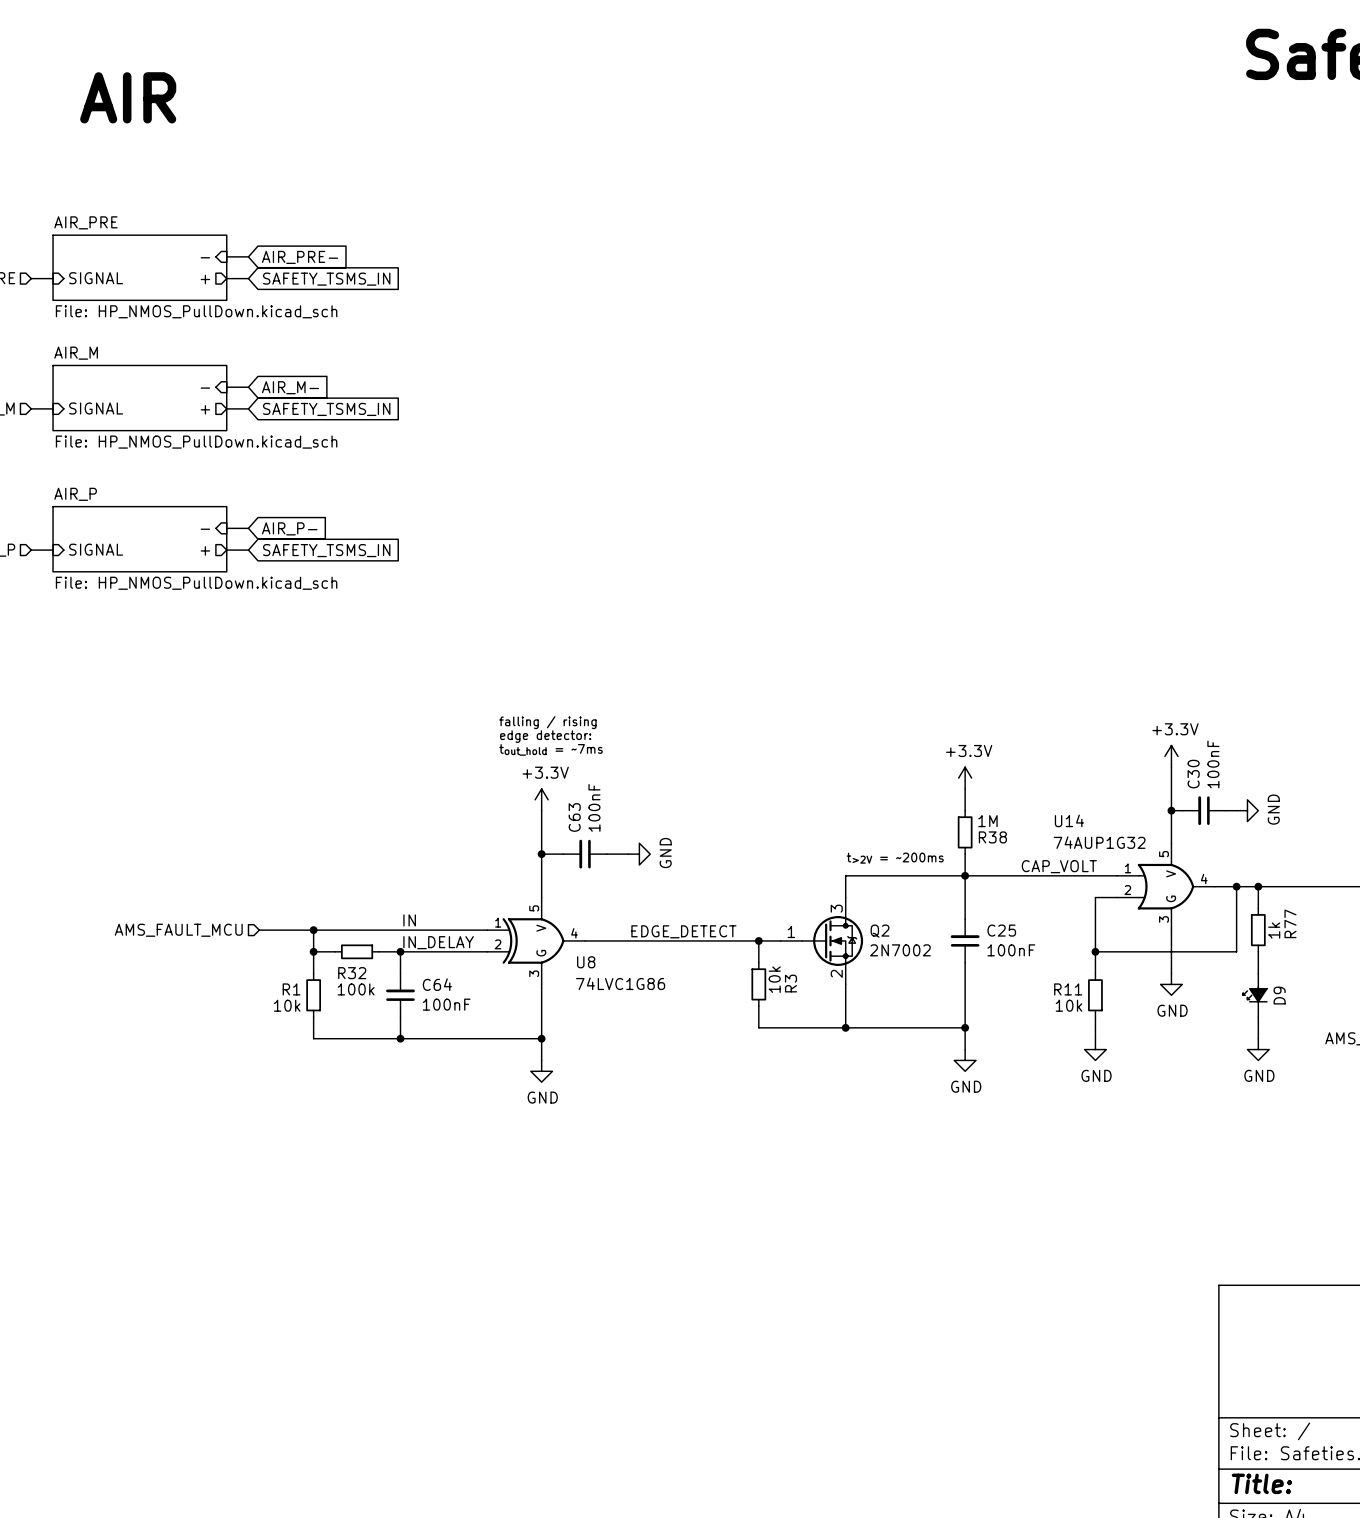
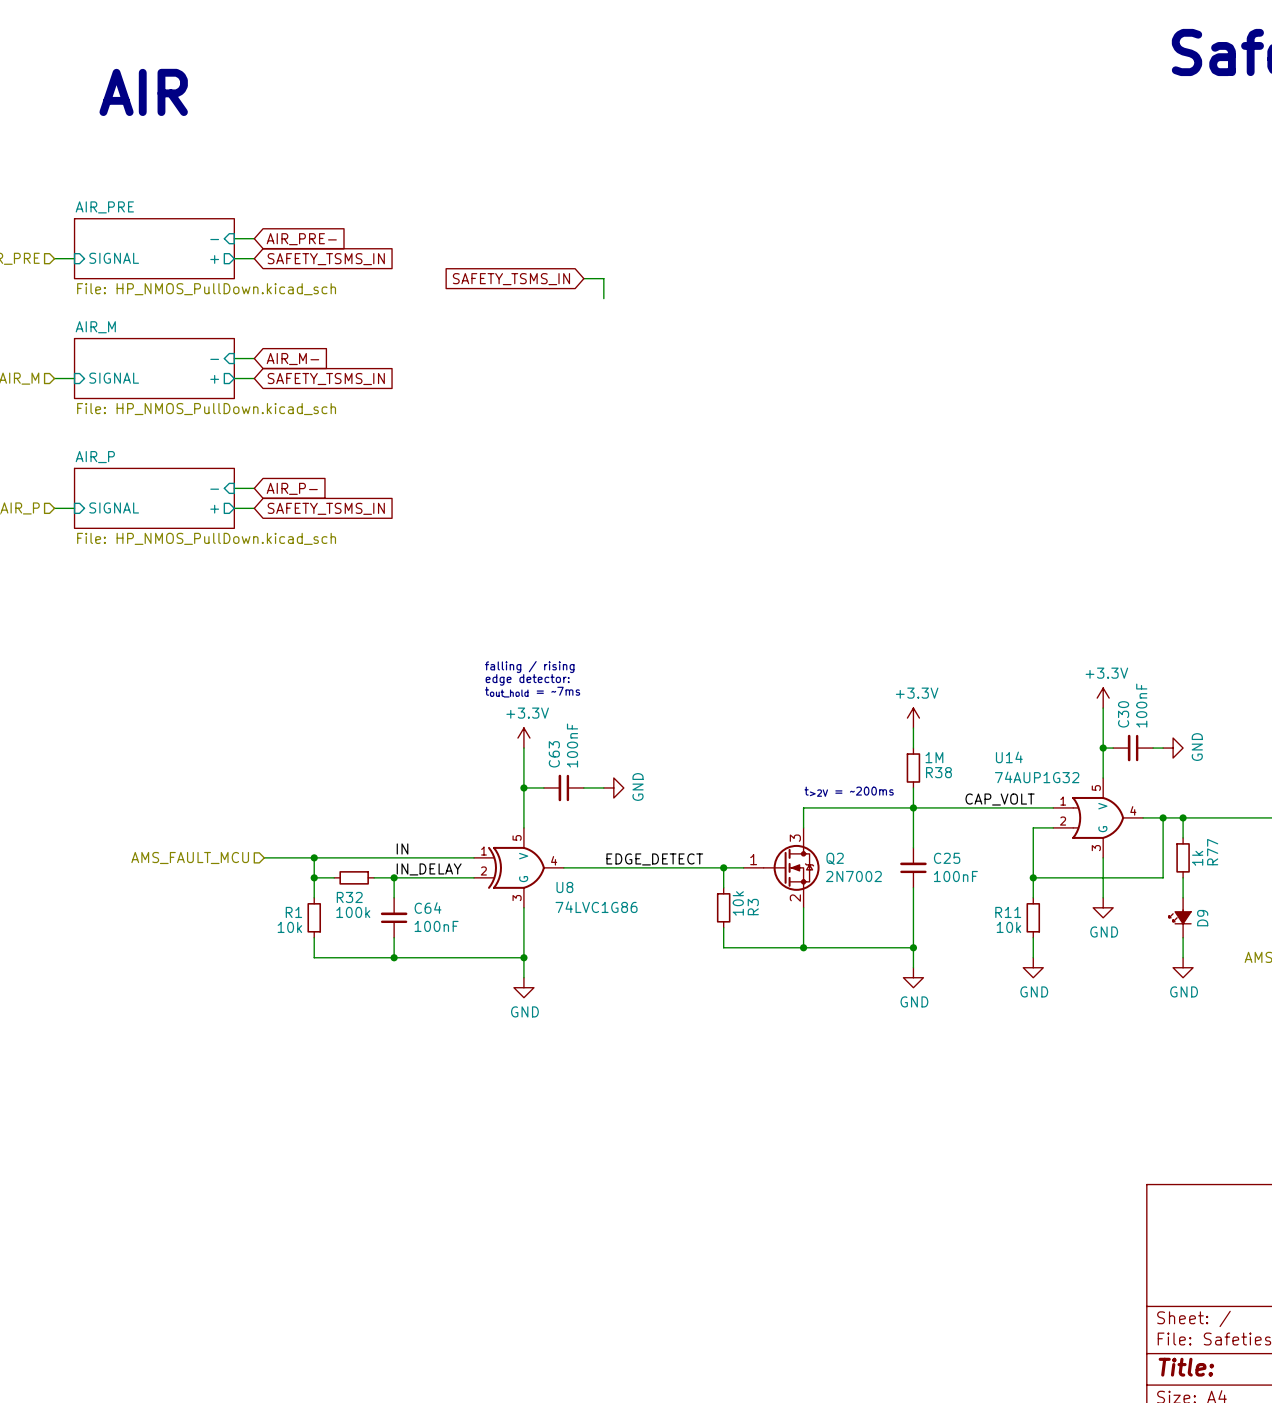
global label: none -> SAFETY_TSMS_IN (511, 279)
wire: none -> (583, 278) (603, 278) (603, 298)

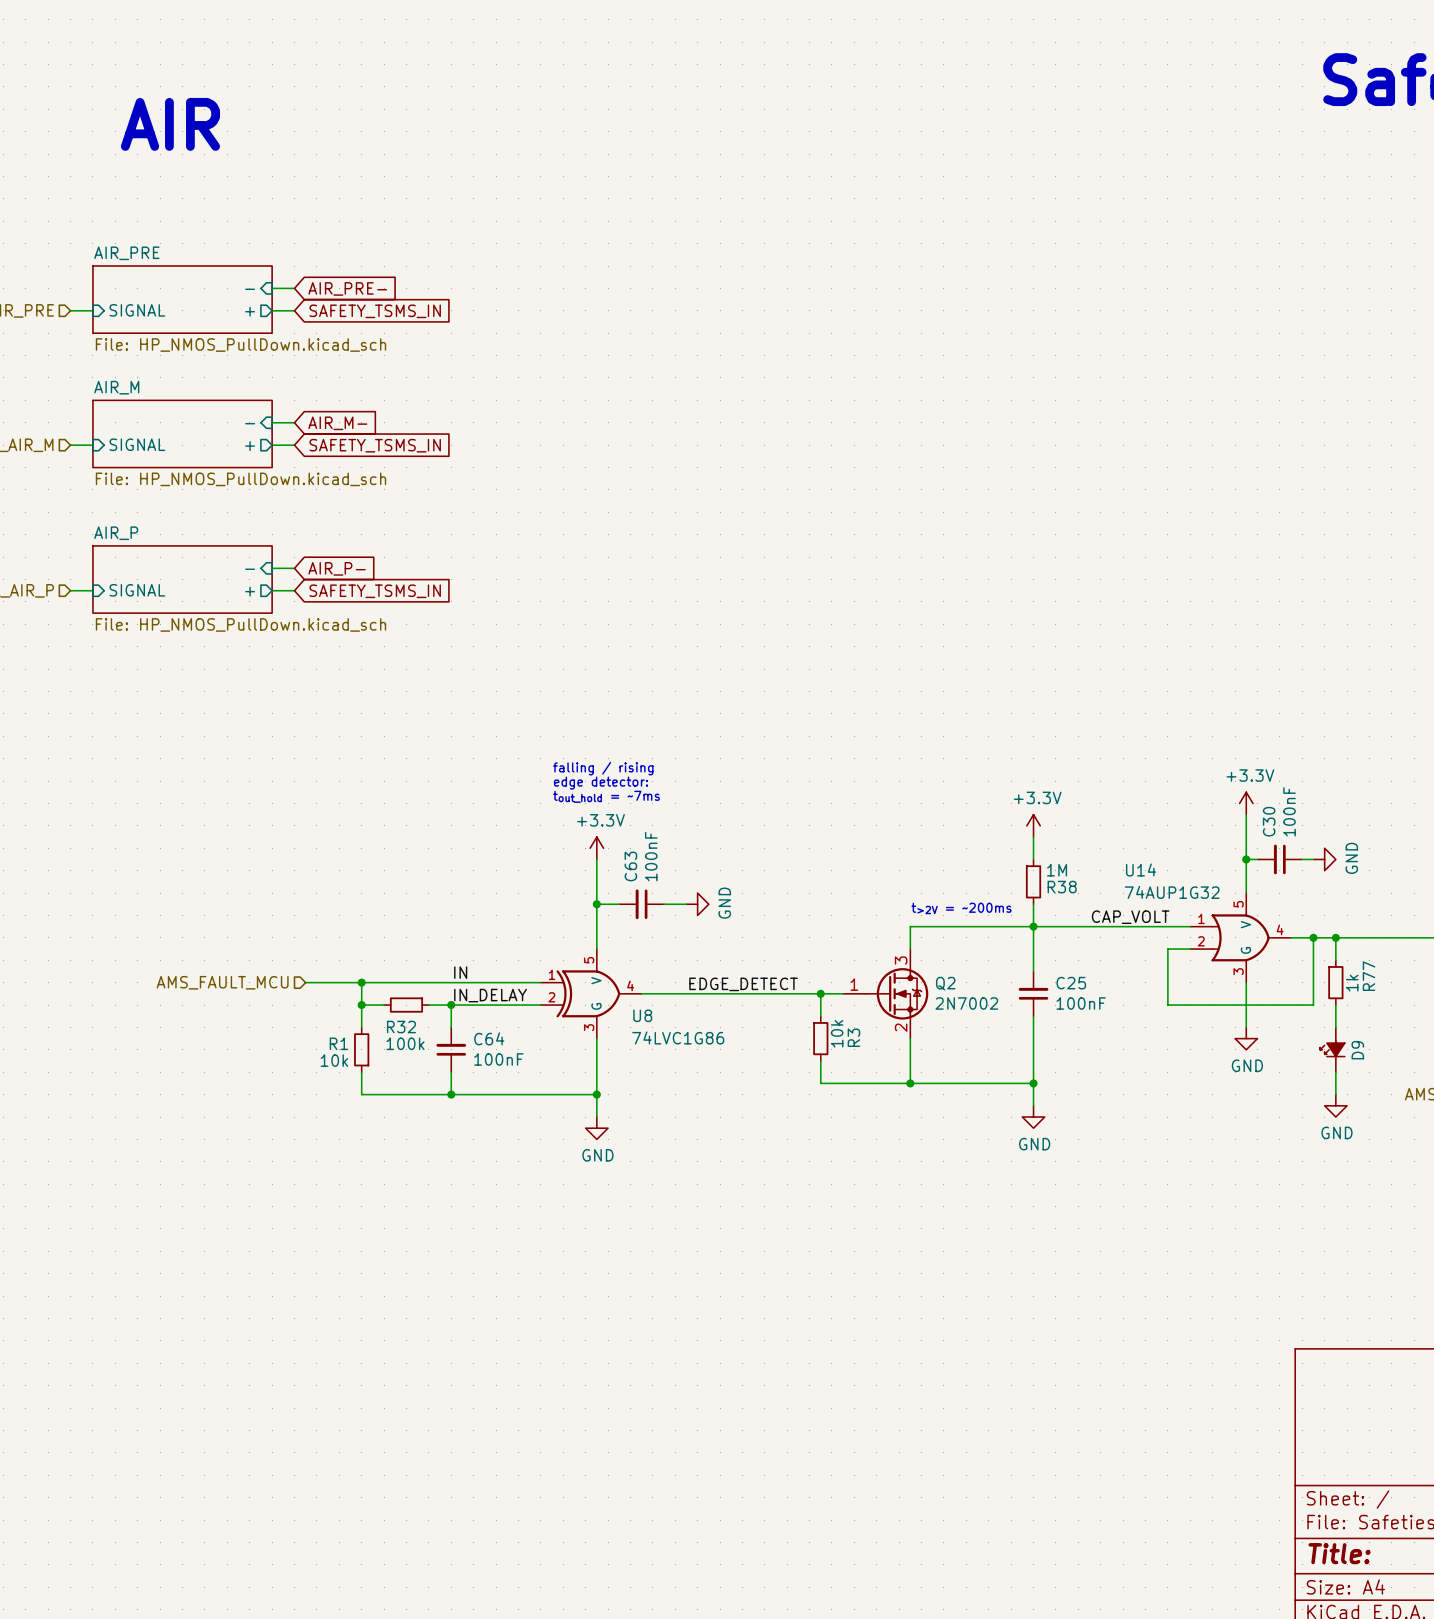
wire: (583, 278) (603, 278) (603, 298) -> none
global label: SAFETY_TSMS_IN (511, 279) -> none
wire: (1033, 877) (1033, 897) -> none
junction: (1033, 877) -> none
R11: 10k (1033, 917) -> none
wire: (1033, 937) (1033, 957) -> none
power symbol: GND (1033, 967) -> none

